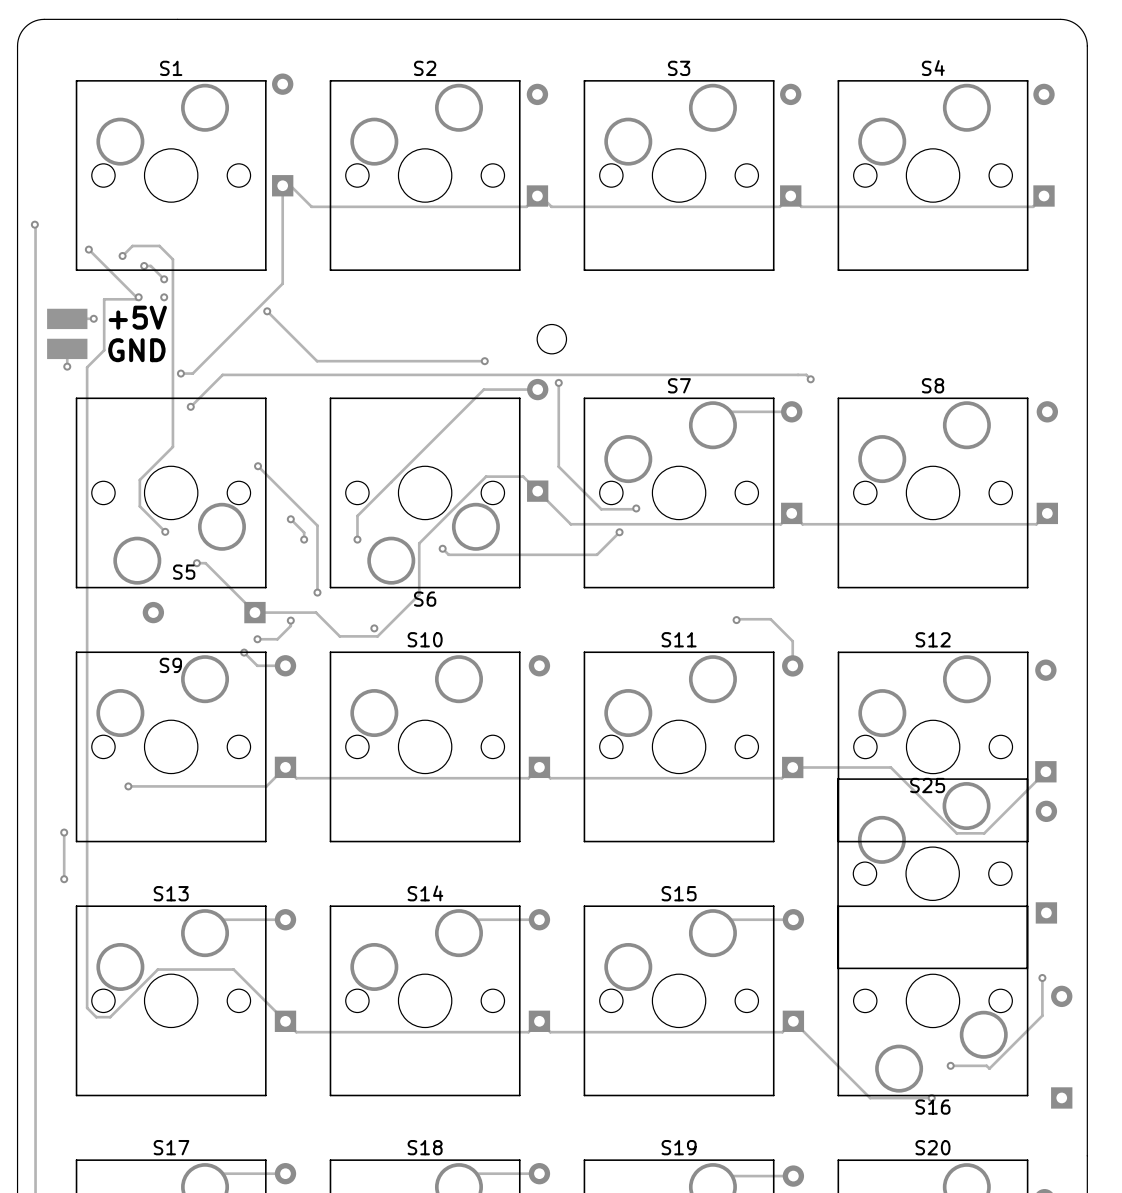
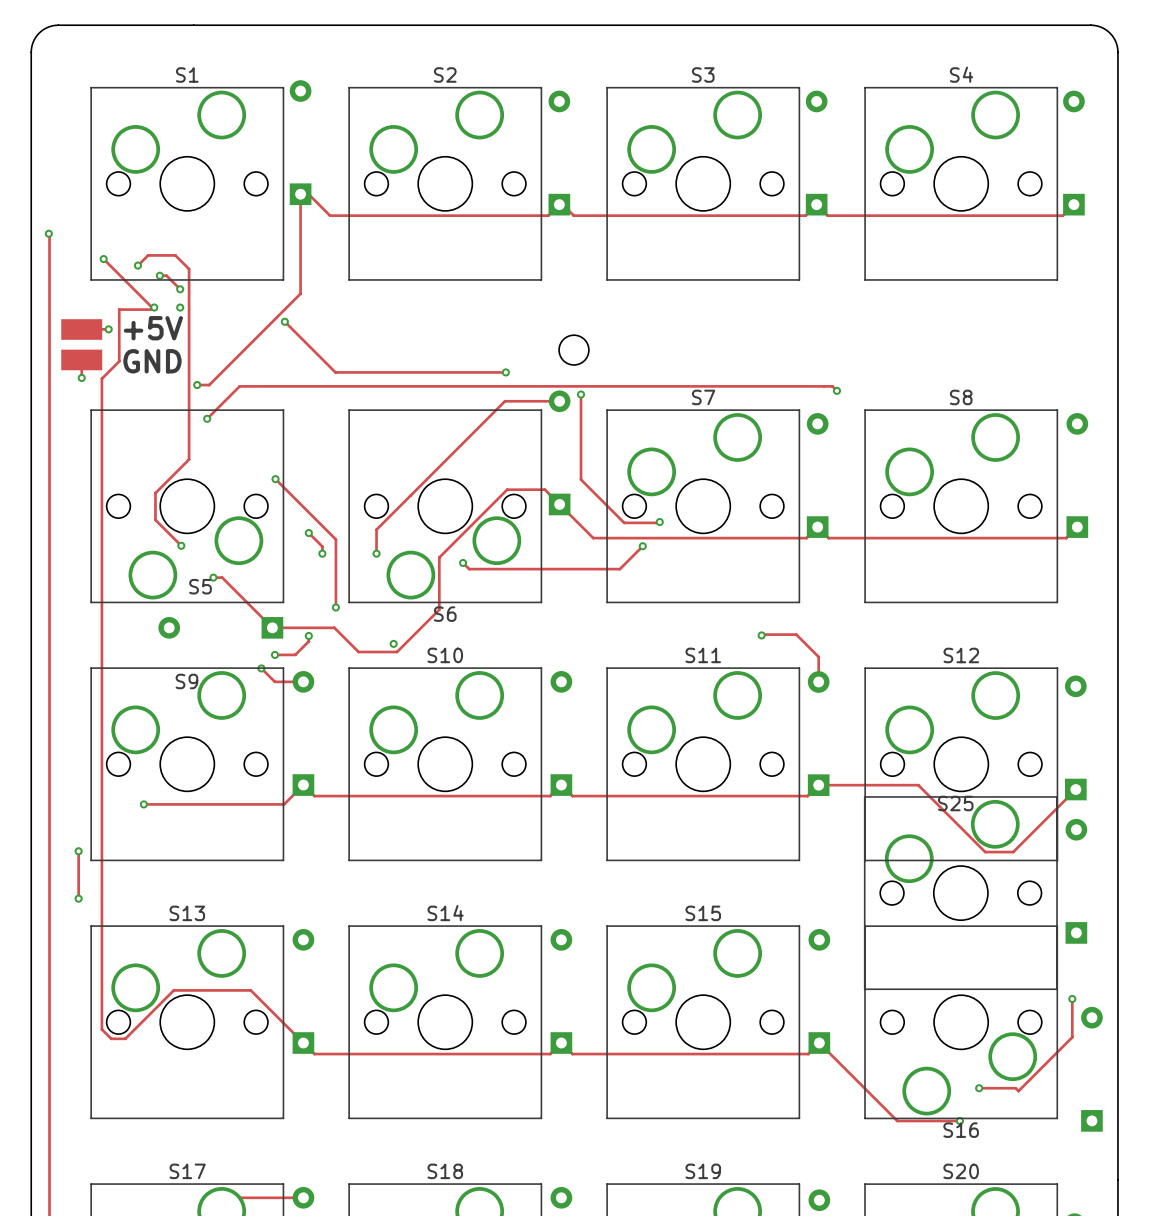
track: (726, 411) (791, 411) -> none
track: (218, 919) (285, 919) -> none
track: (472, 919) (539, 919) -> none
track: (726, 919) (793, 919) -> none
track: (472, 1173) (539, 1173) -> none
track: (723, 1176) (793, 1176) -> none

